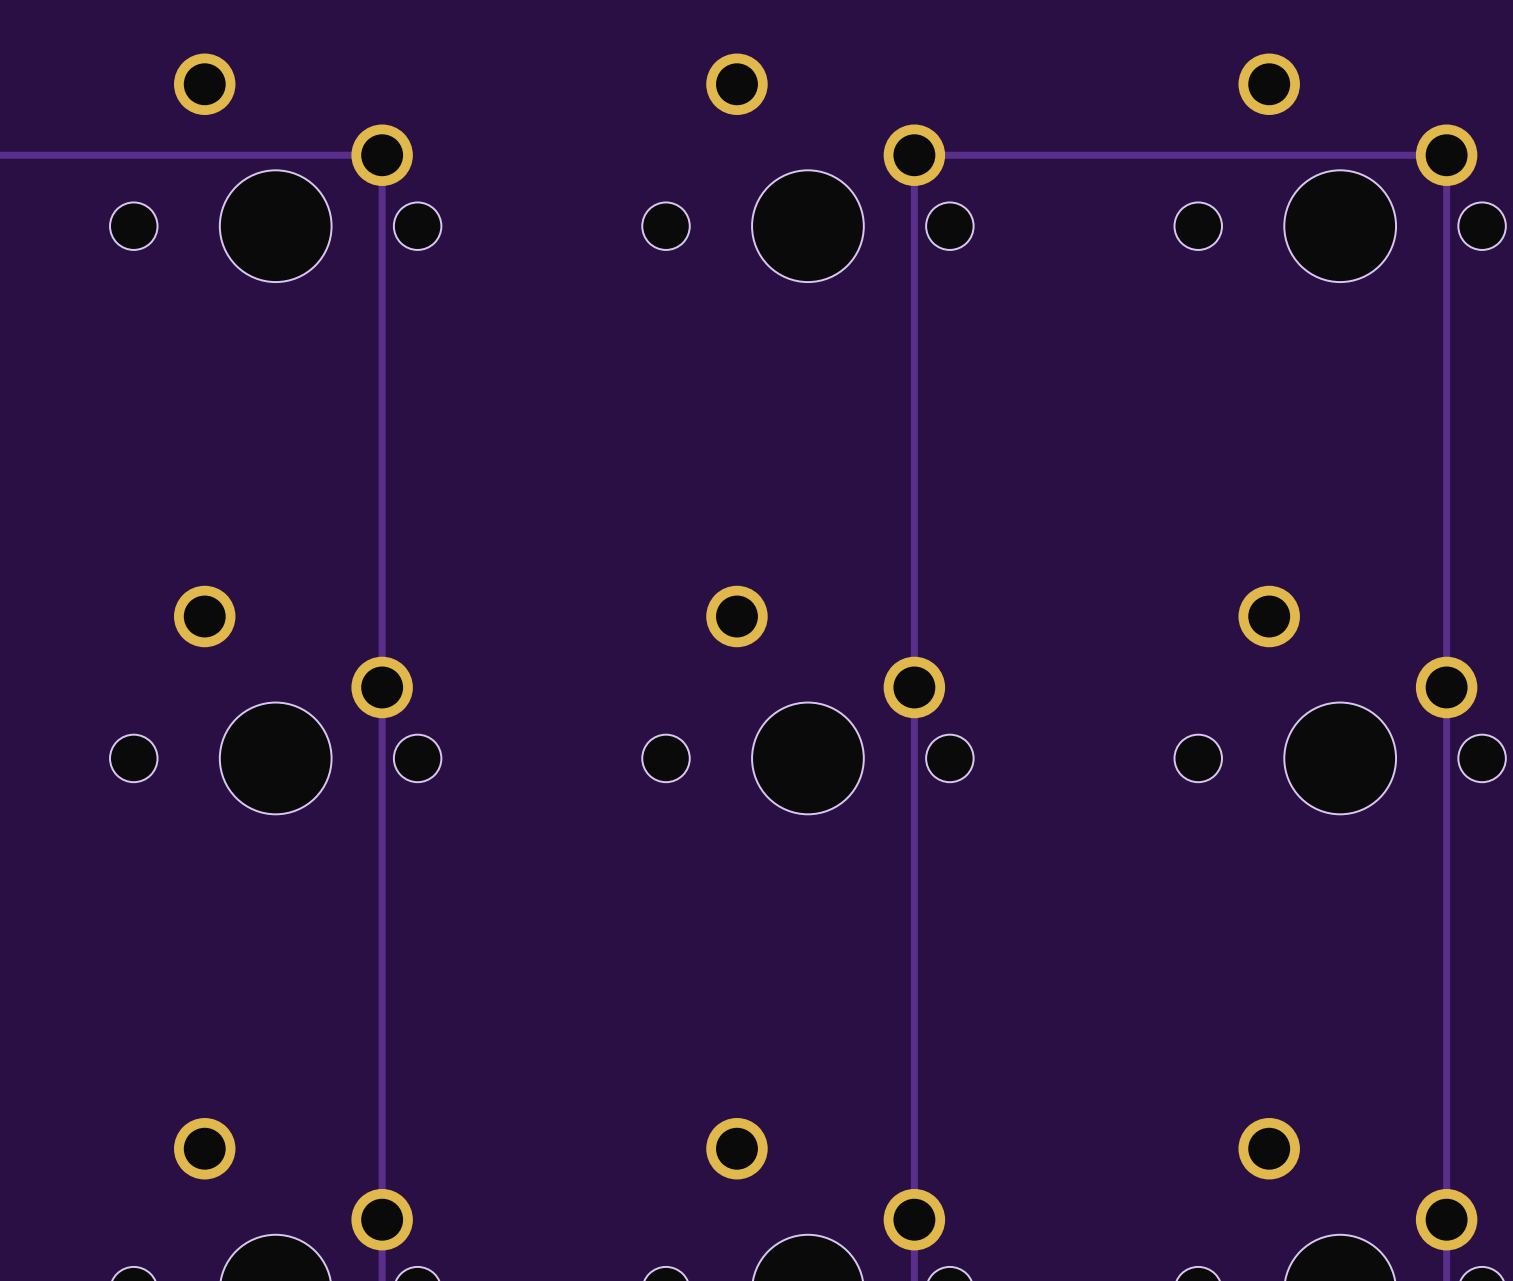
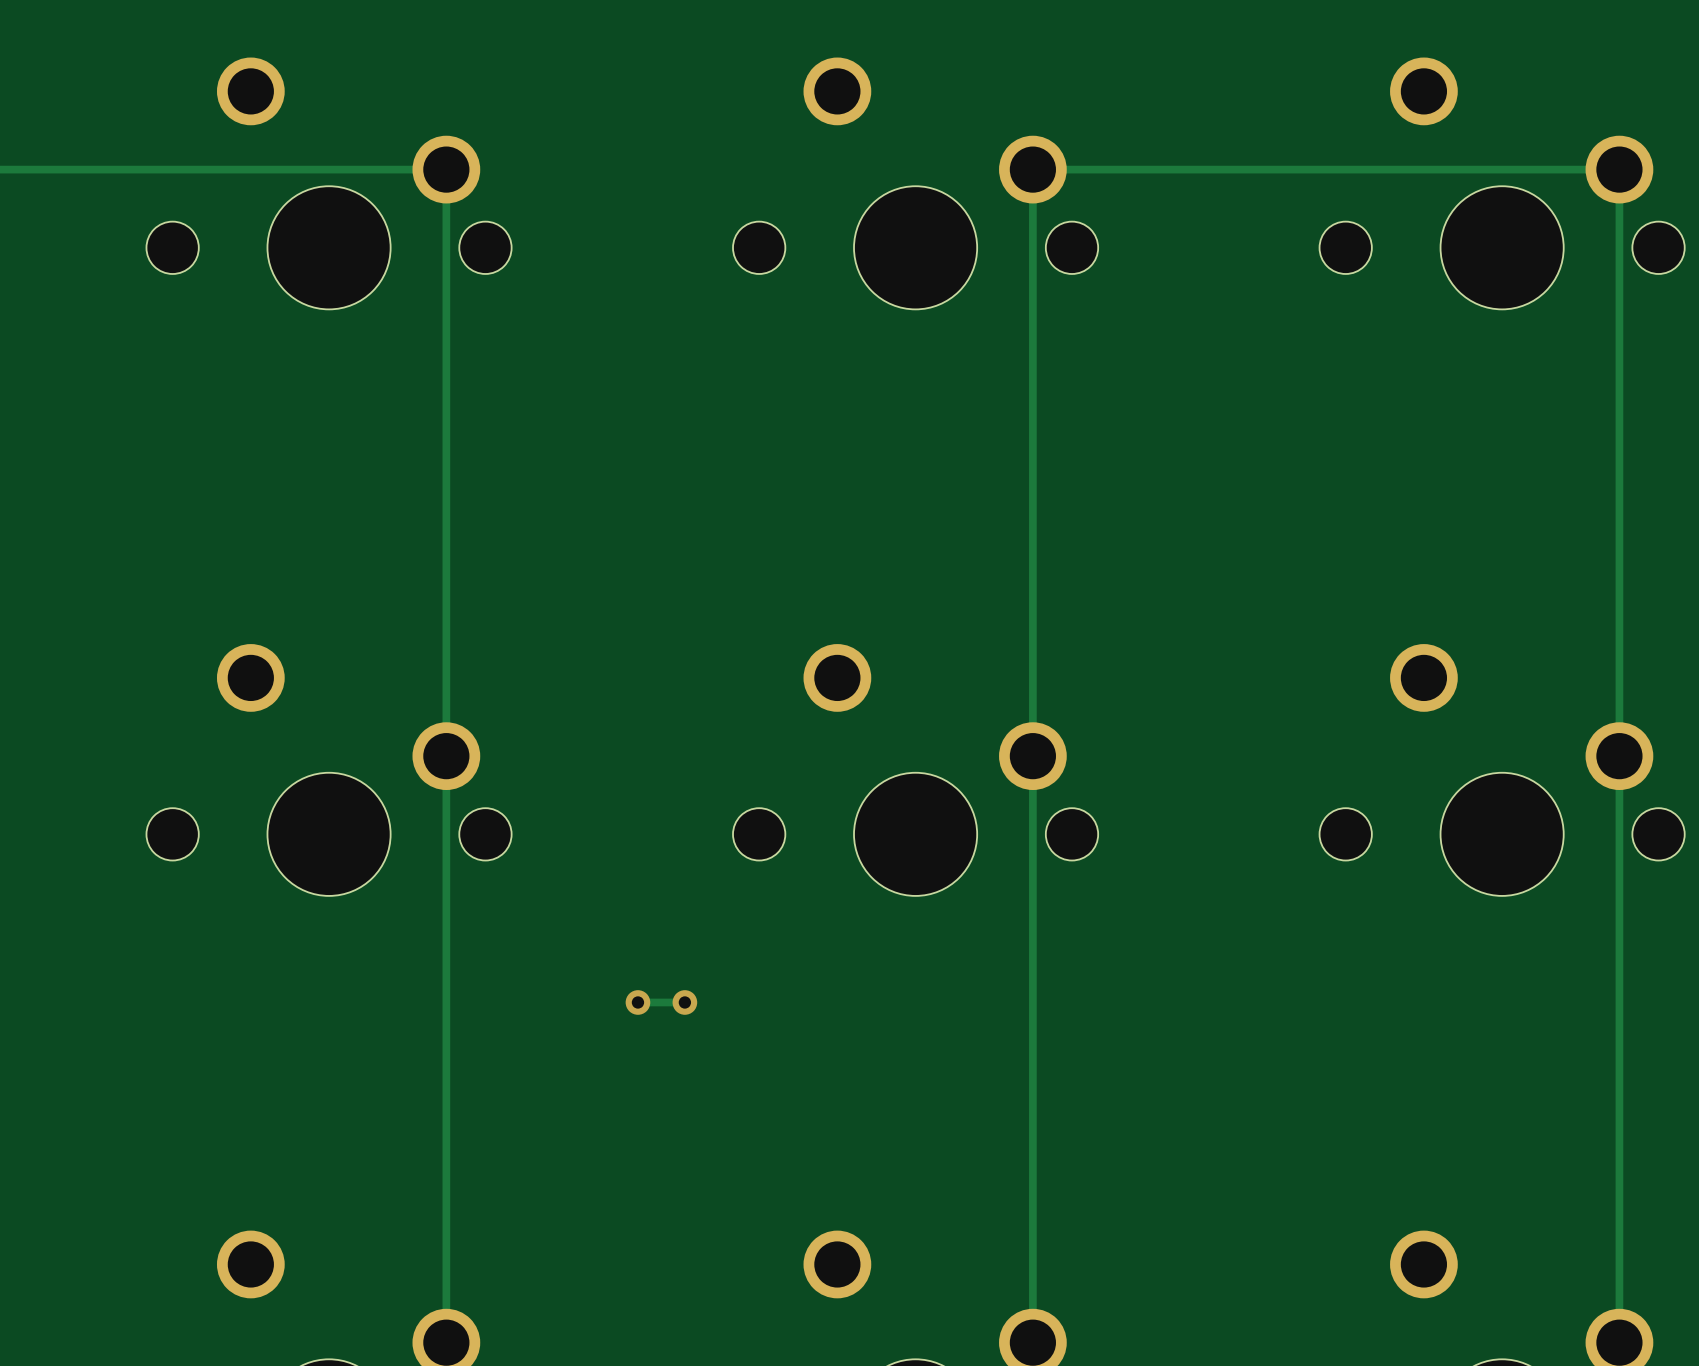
via: none -> (637, 1002)
track: none -> (684, 1002) (637, 1002)
via: none -> (684, 1002)

